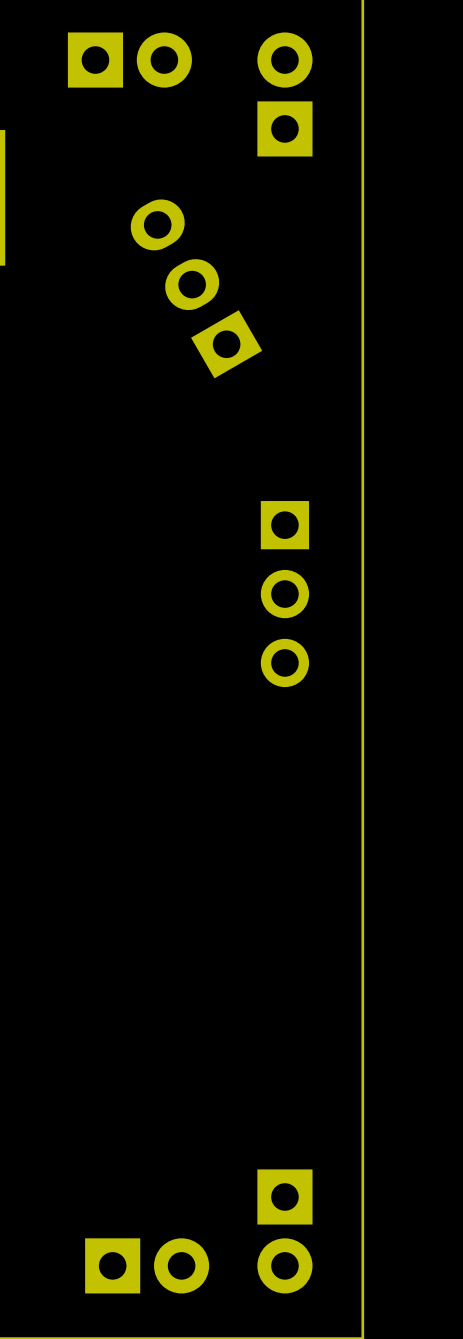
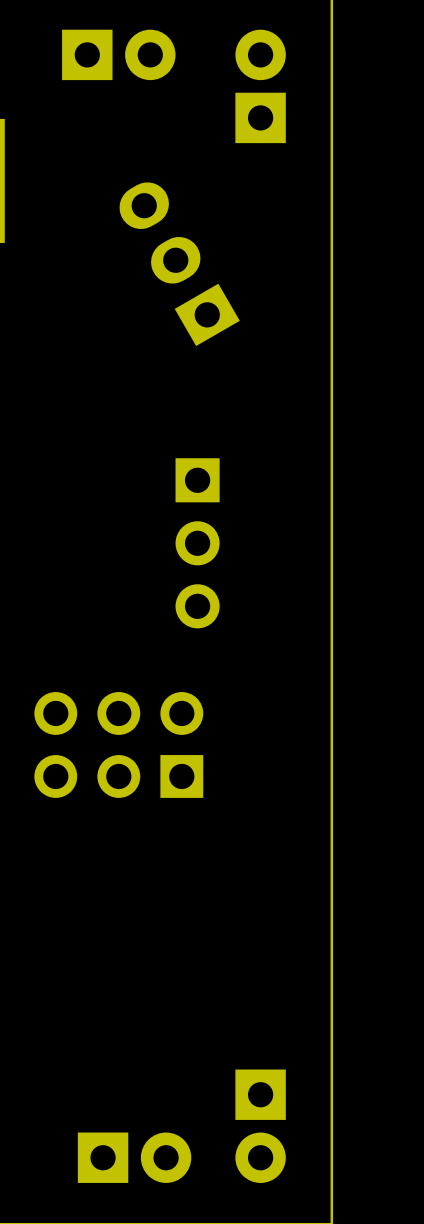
part position: (284, 594) -> (197, 543)
part: none -> (118, 744)

